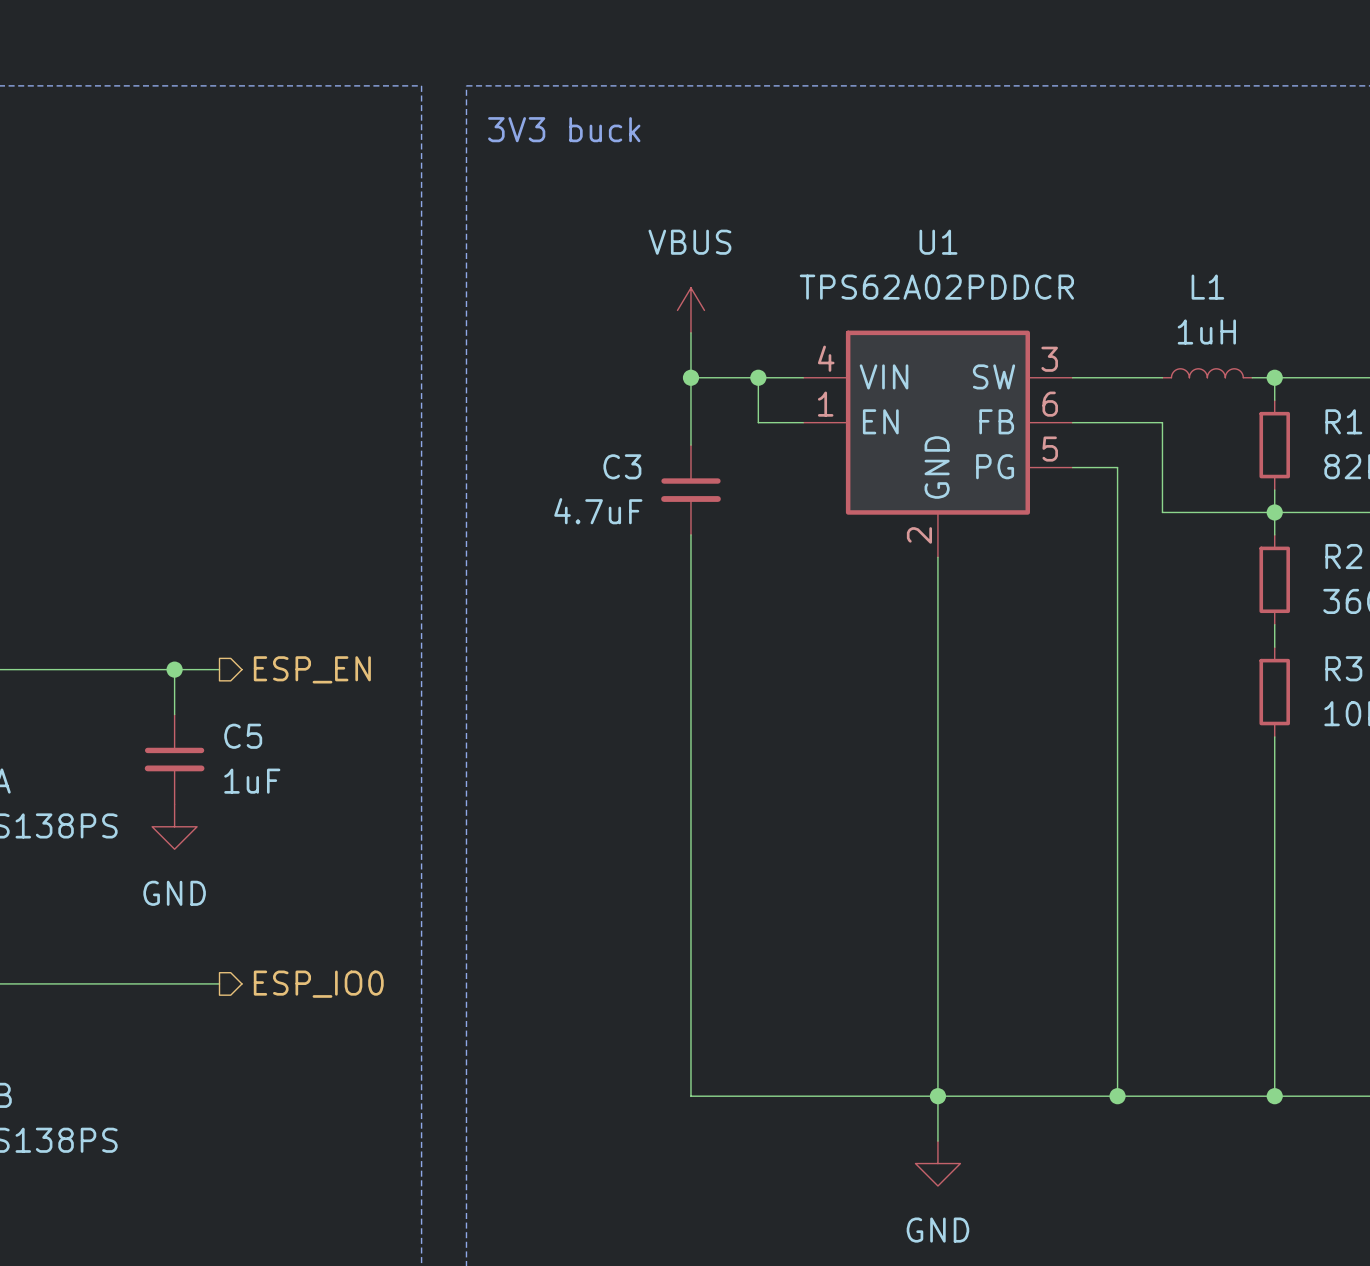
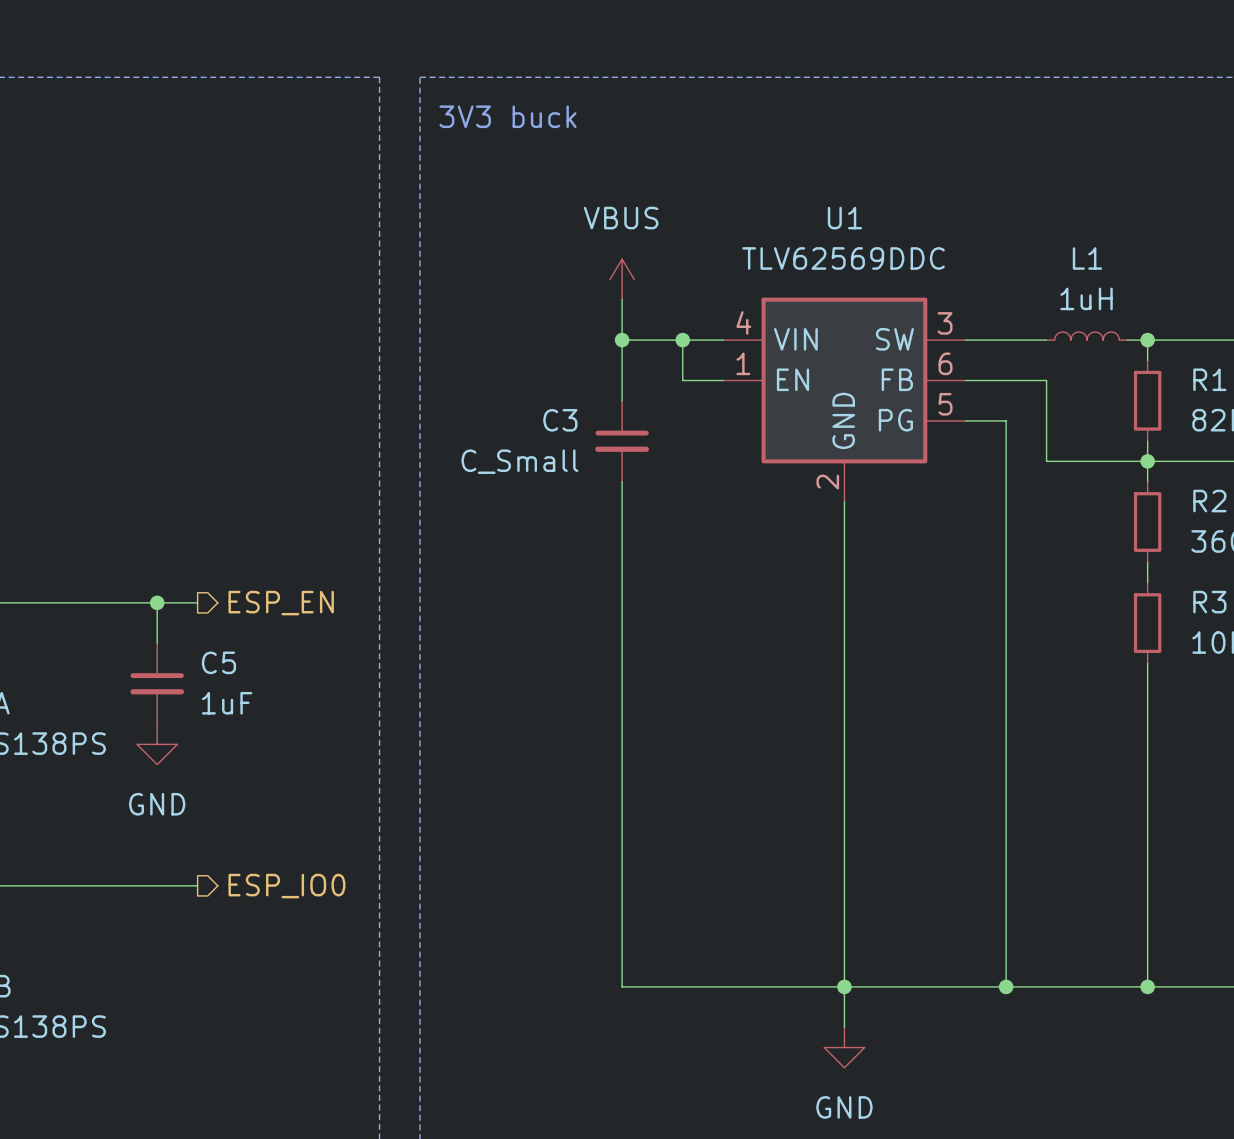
U1 value: TPS62A02PDDCR (936, 287) -> TLV62569DDC (843, 258)
C3 value: 4.7uF (598, 511) -> C_Small (519, 461)

